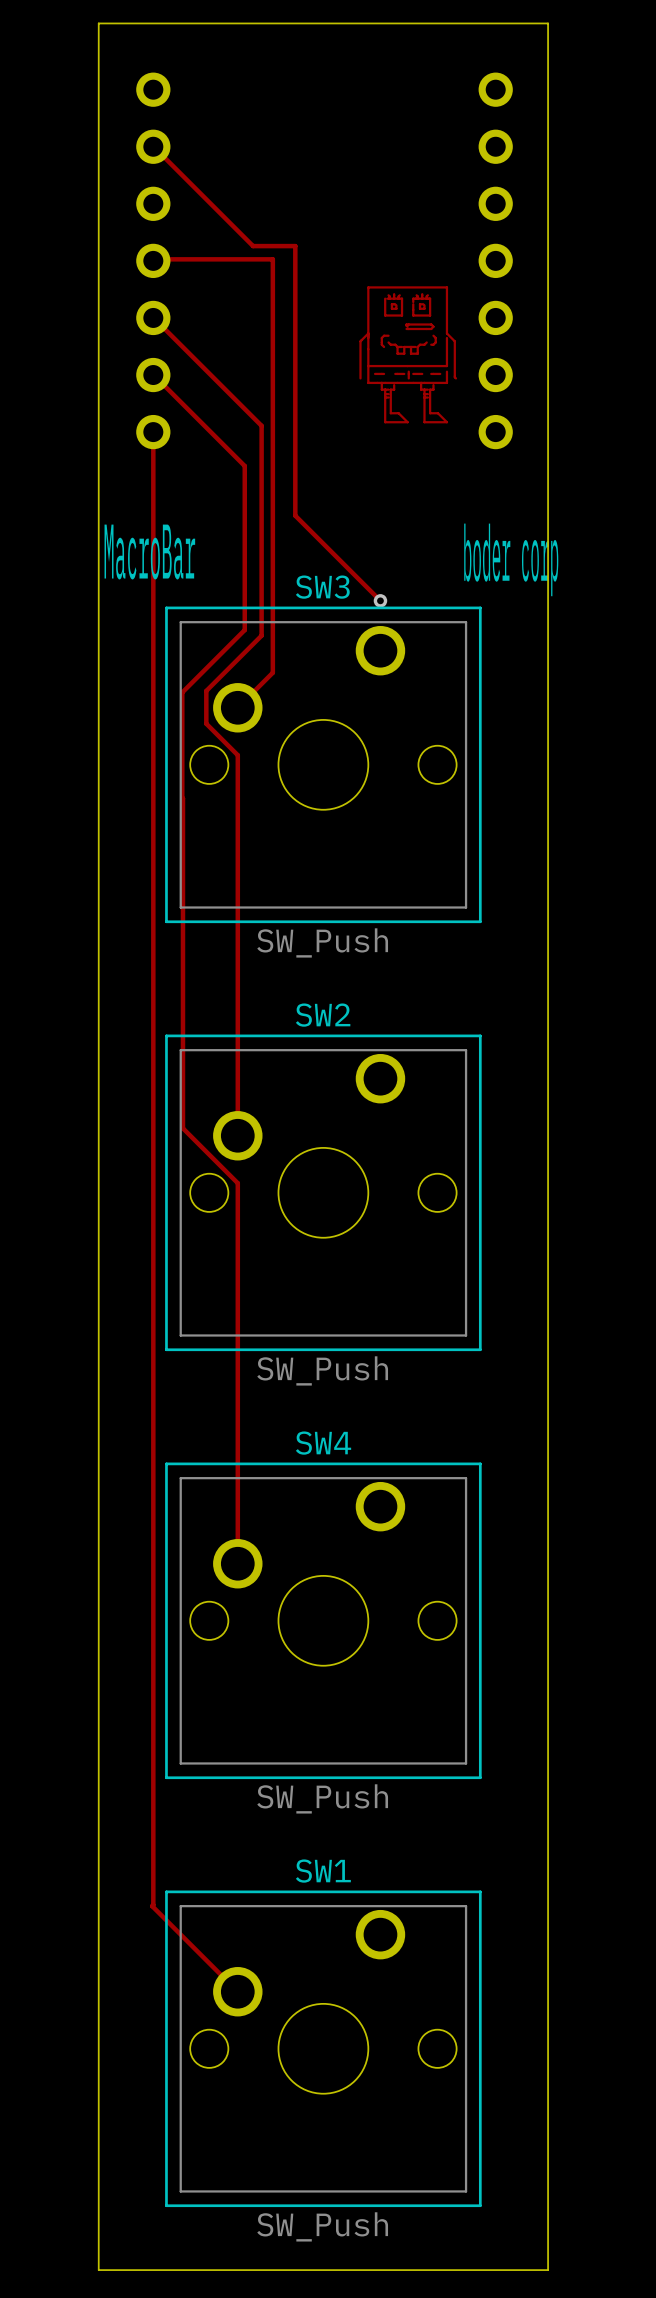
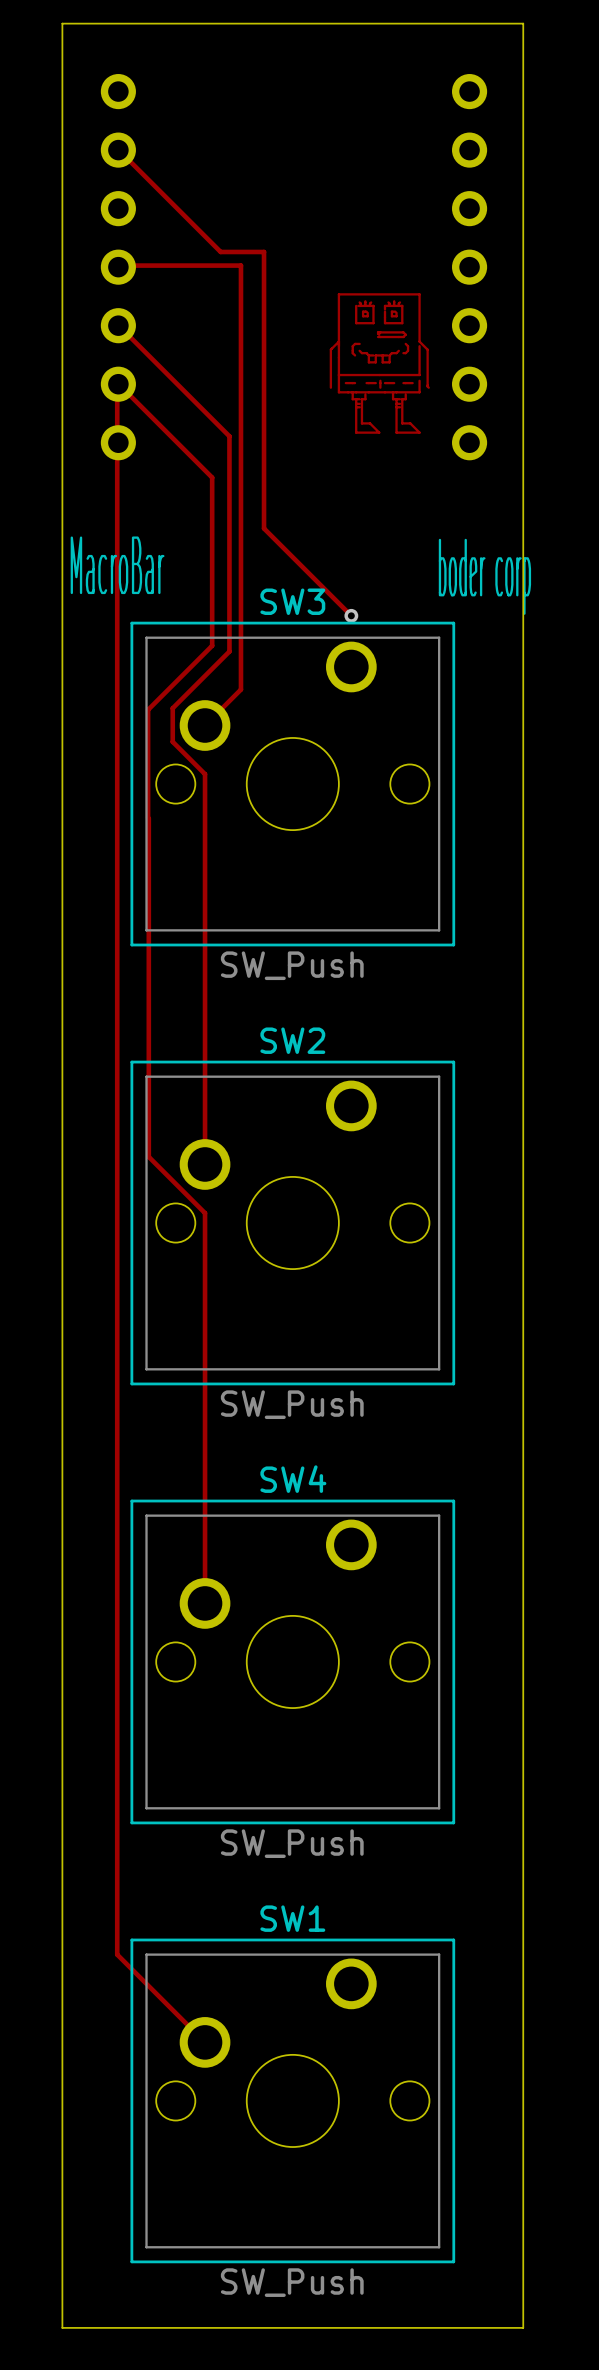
track: (153, 432) (152, 1906) -> (117, 397) (117, 1954)

